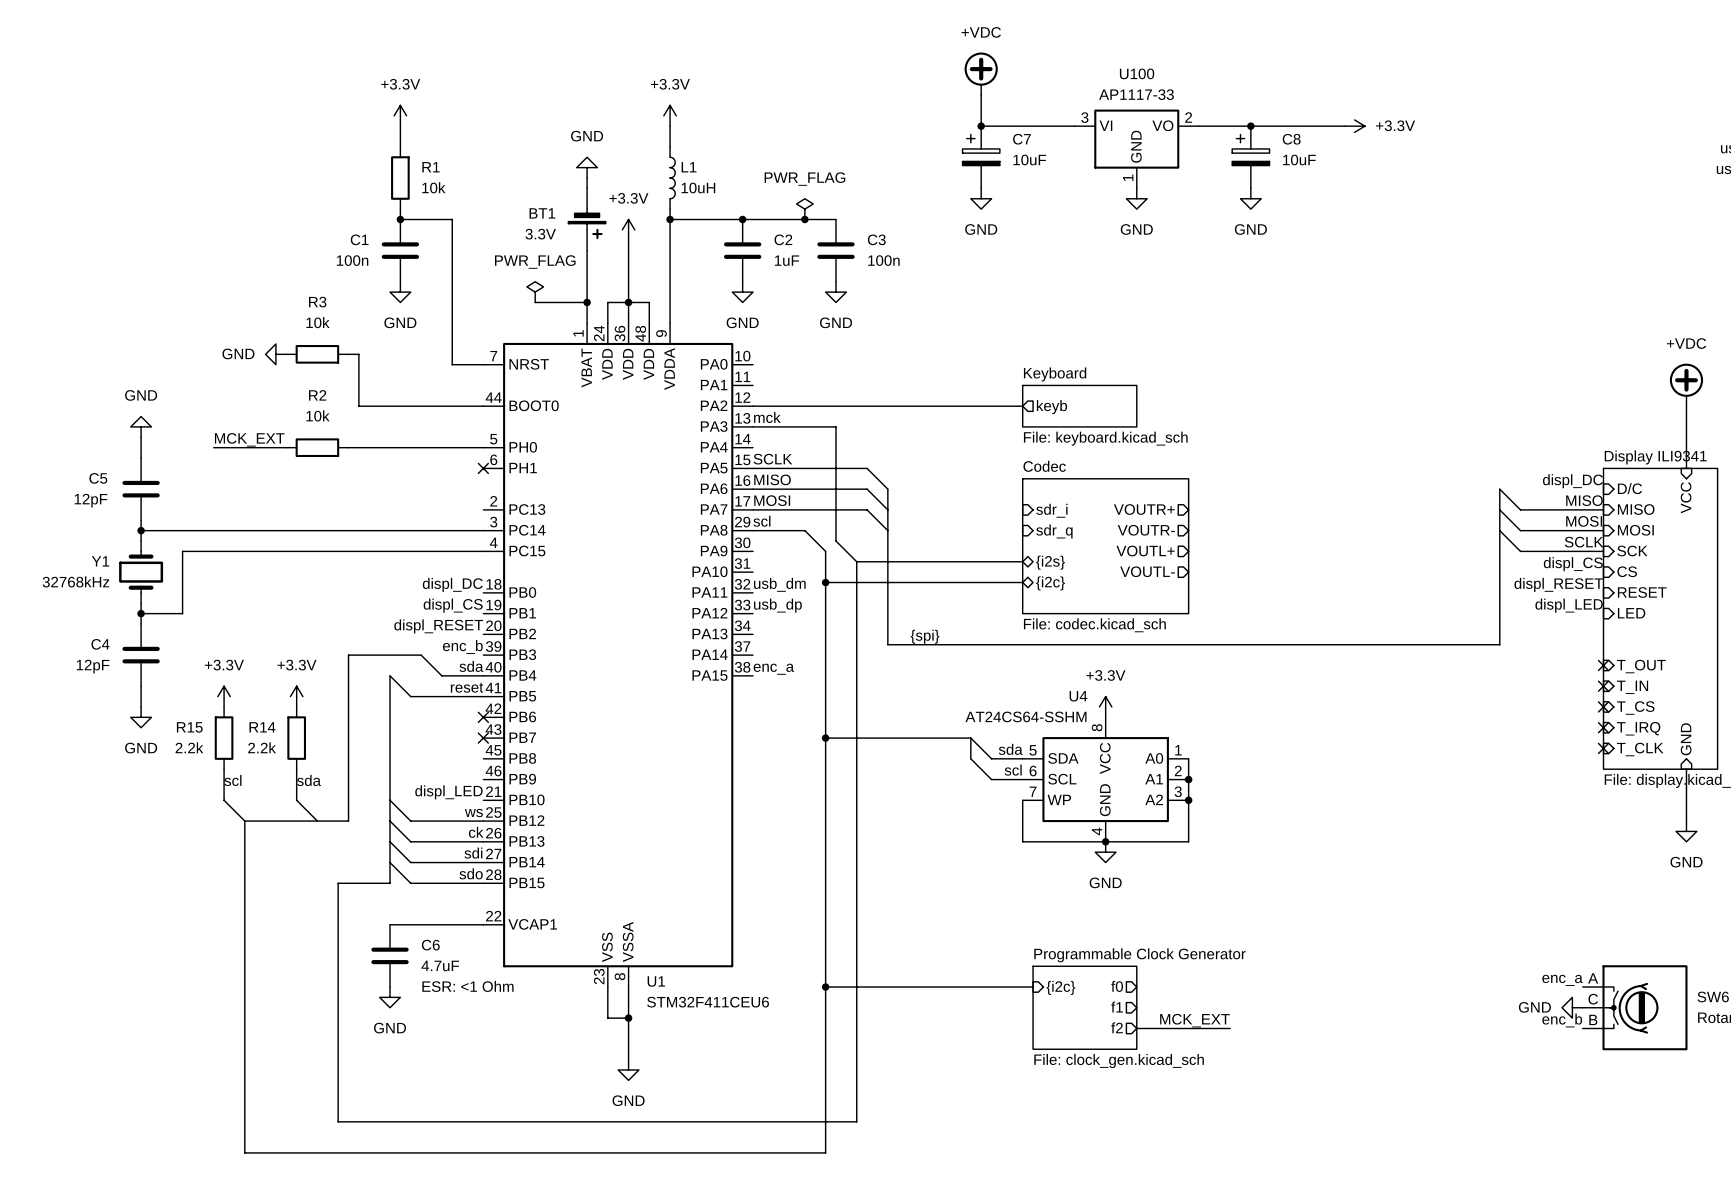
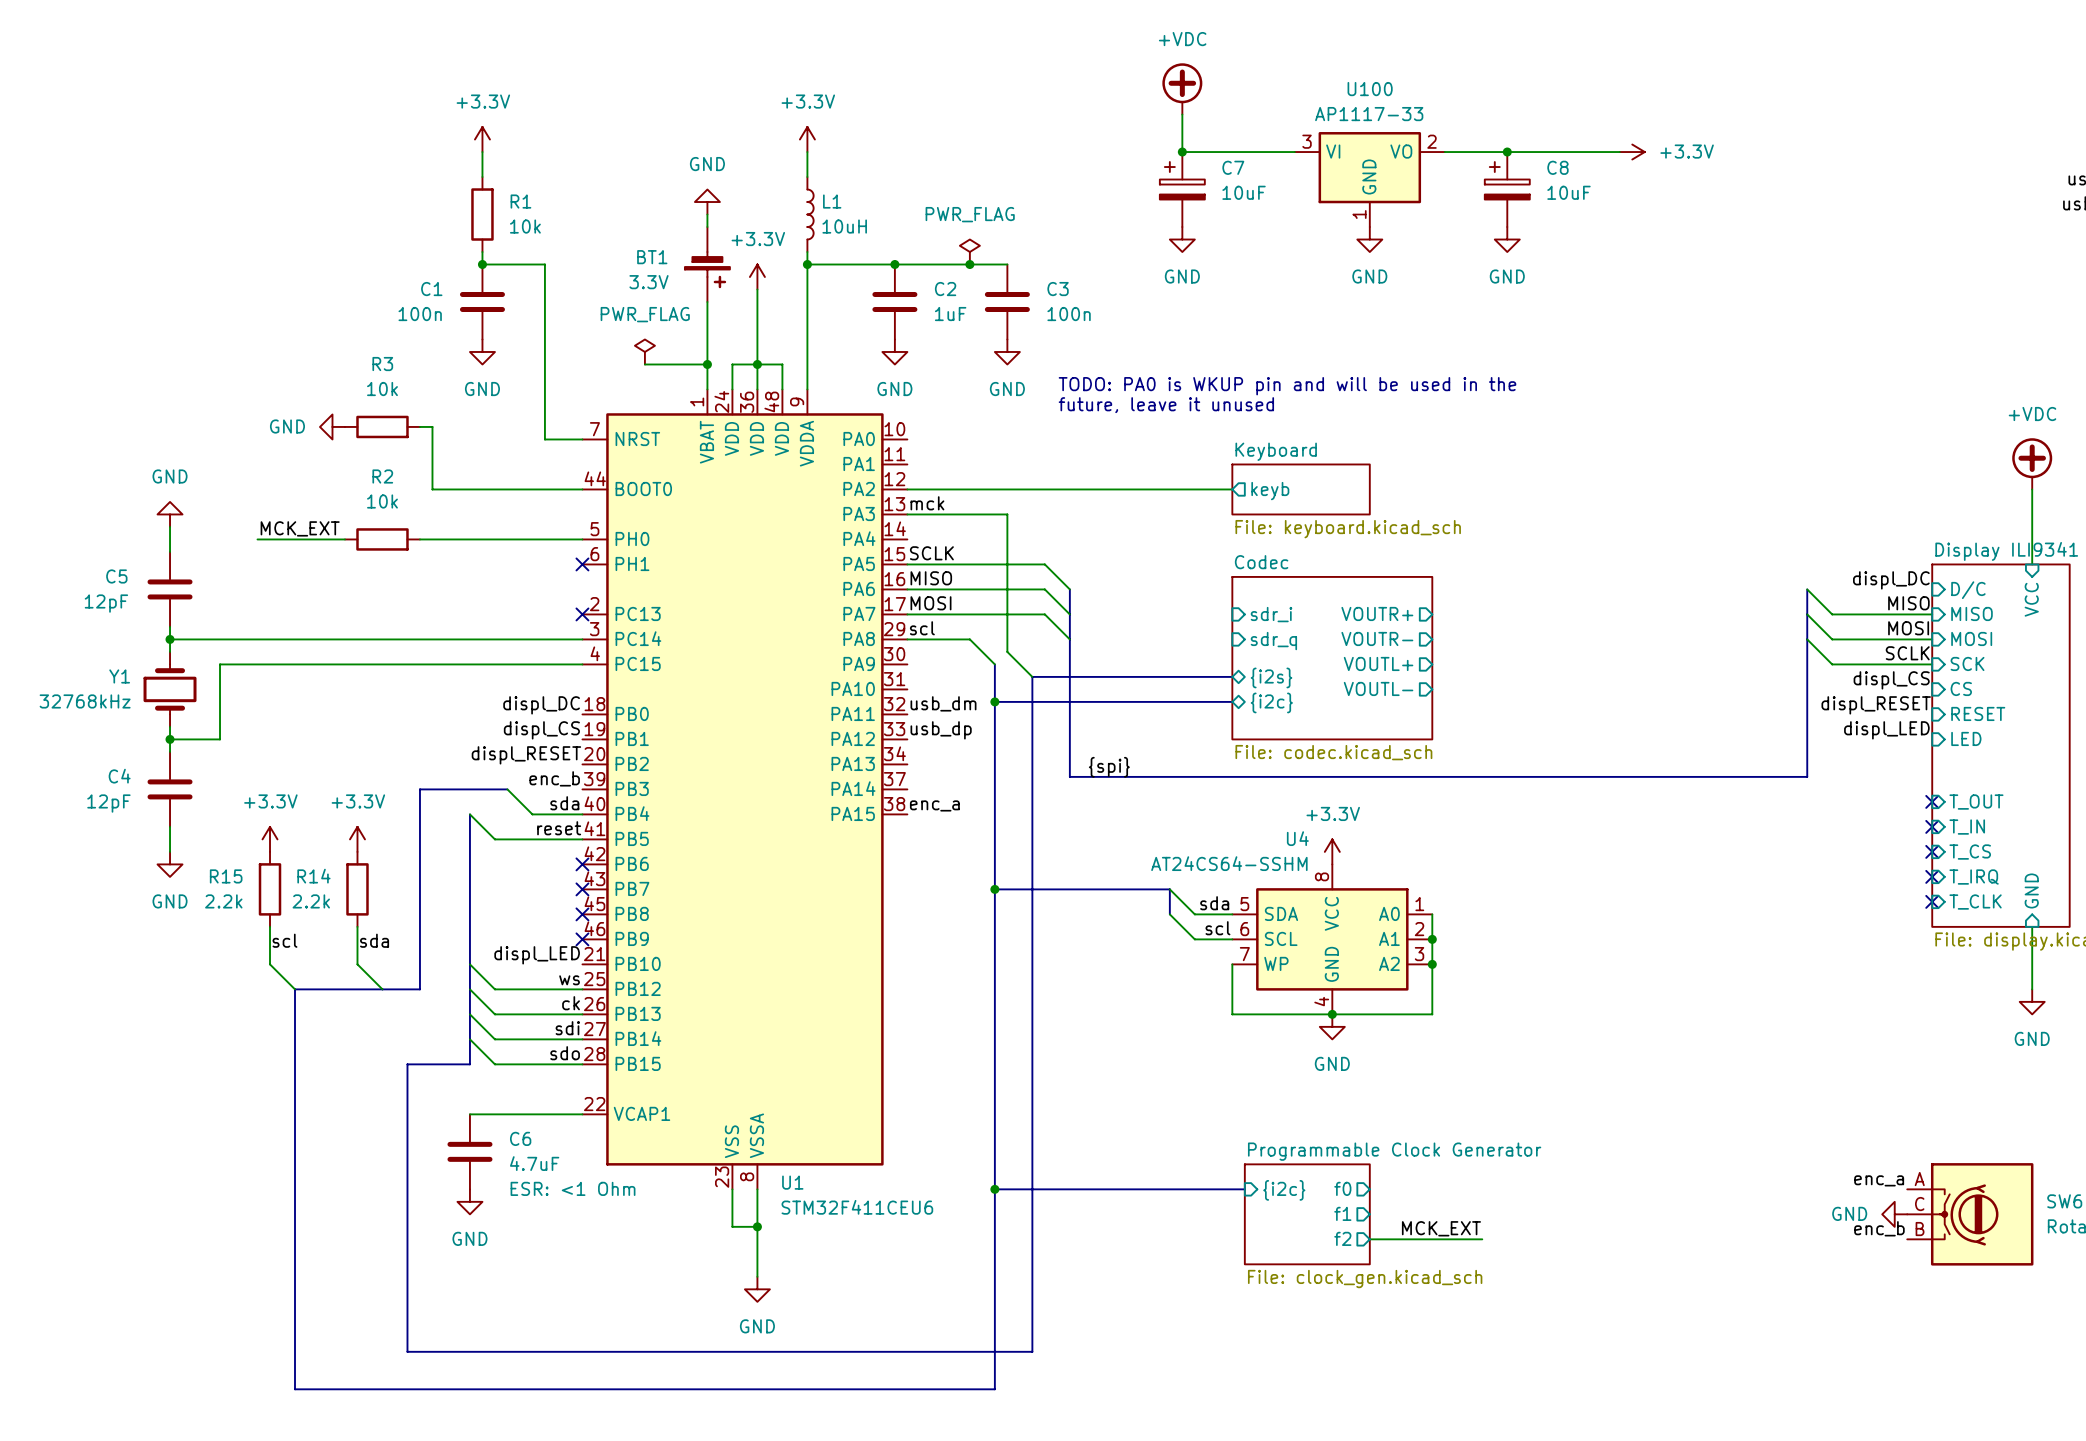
text: none -> TODO: PA0 is WKUP pin and will be used in the (1287, 386)
text: none -> future, leave it unused (1166, 405)
no-connect mark: none -> (582, 614)
no-connect mark: none -> (582, 914)
no-connect mark: none -> (582, 939)

